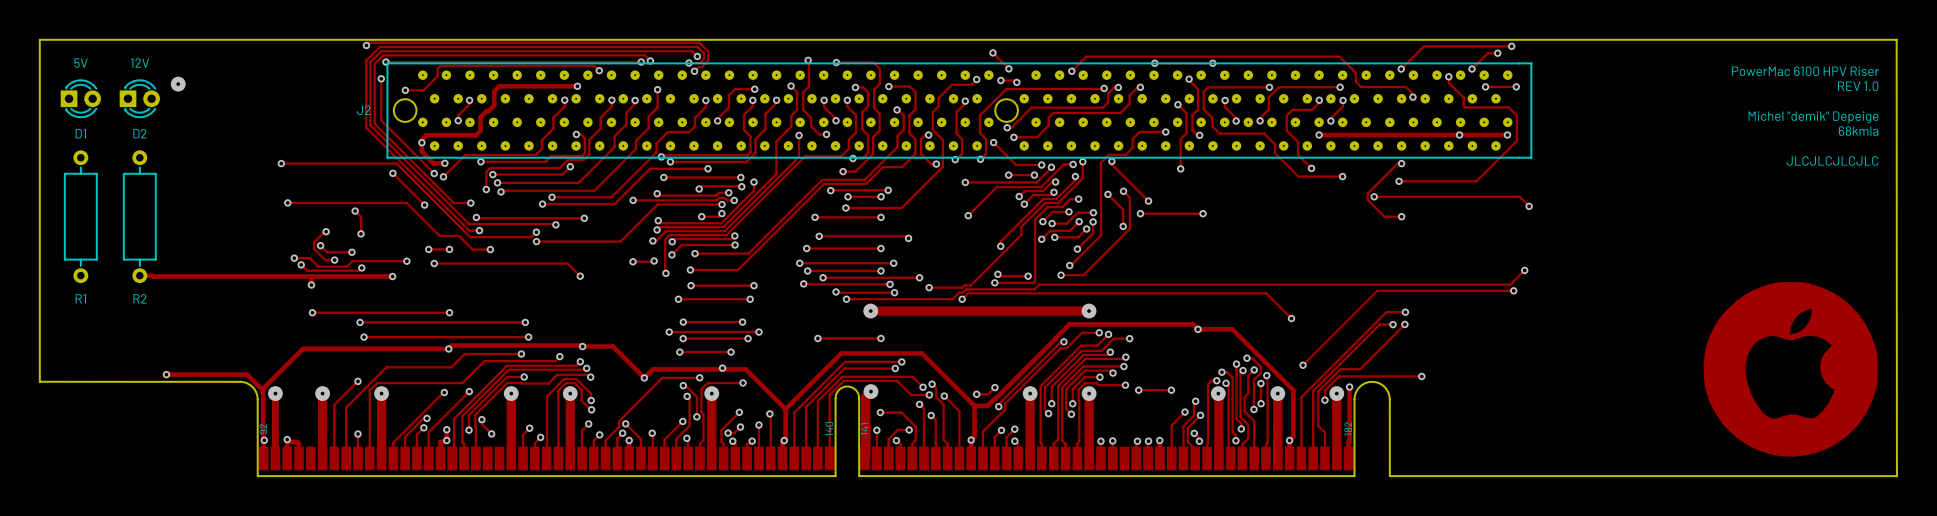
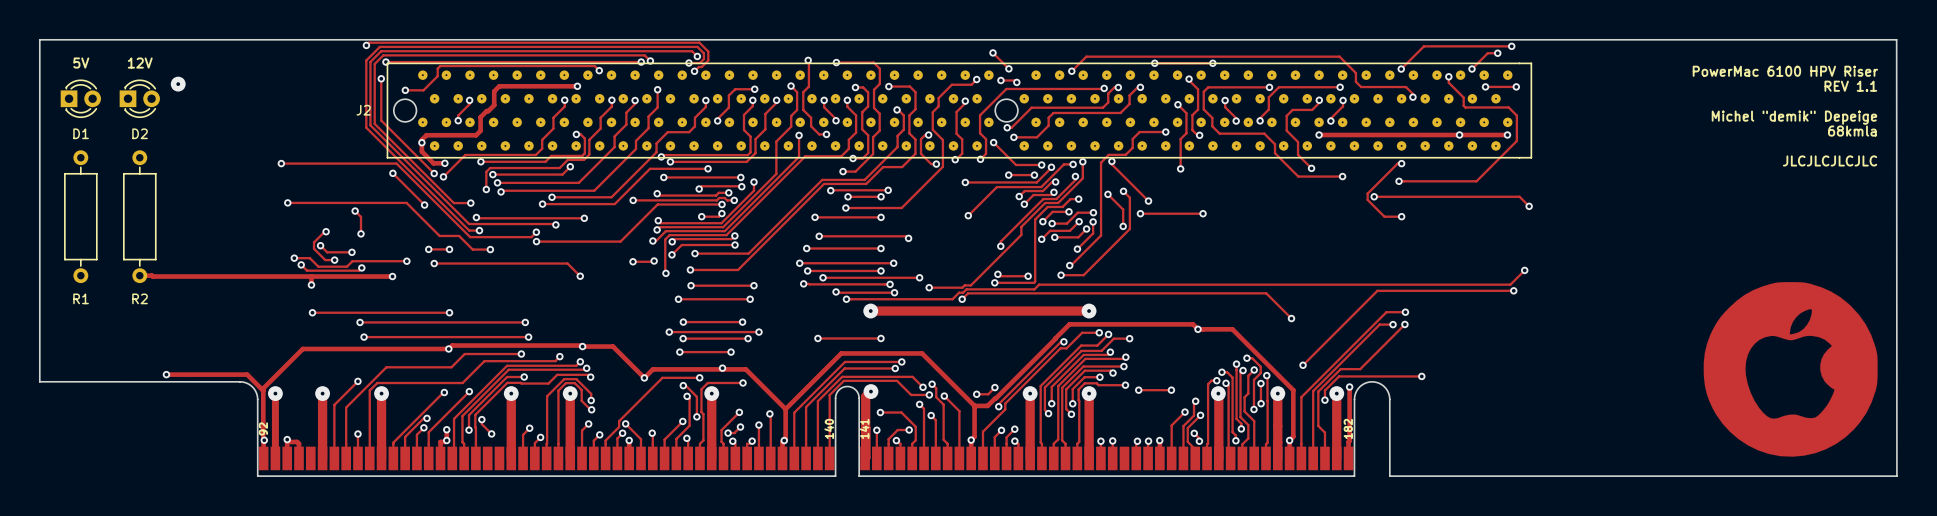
text: REV 1.0 (1858, 86) -> REV 1.1 (1850, 86)

